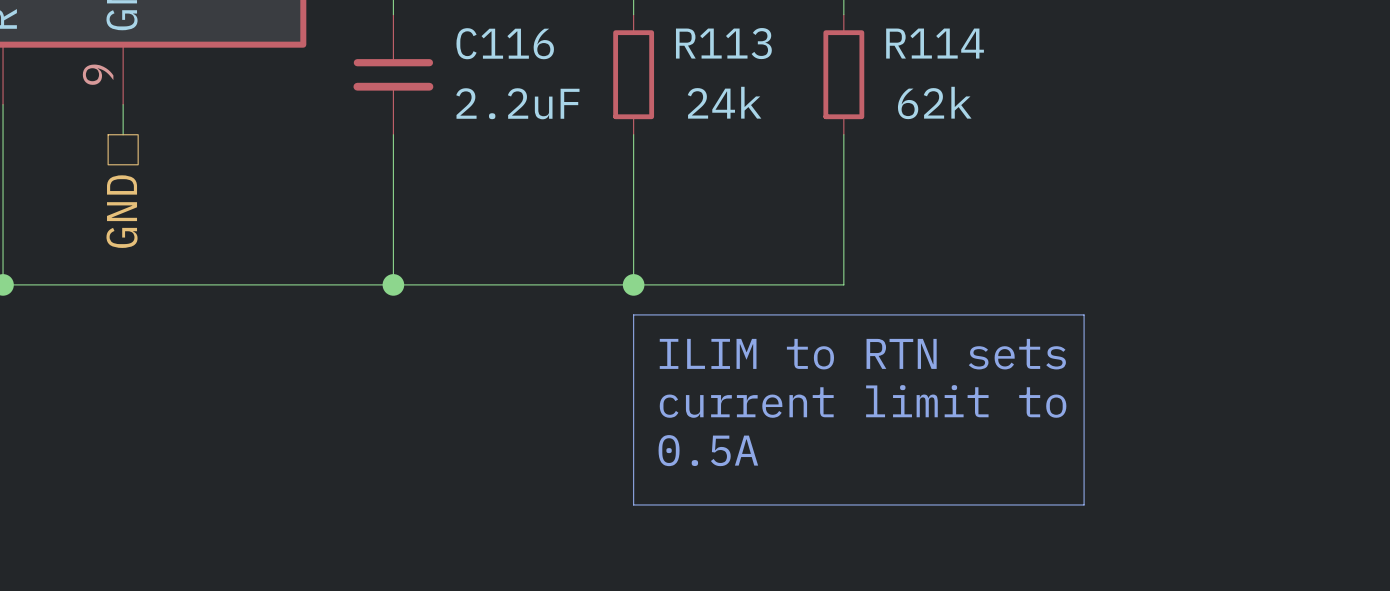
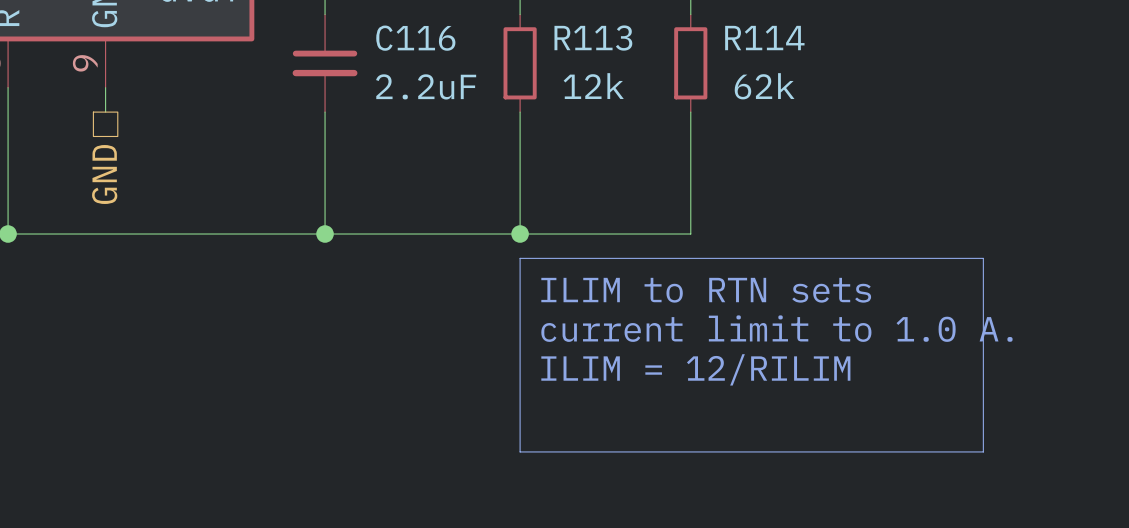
R113 value: 24k (724, 102) -> 12k (593, 86)
line: (1084, 314) (1084, 504) (633, 504) -> (885, 258) (983, 258) (983, 451) (520, 451) (520, 412)
text: current limit to (863, 401) -> current limit to 1.0 A. (776, 328)
text: 0.5A (708, 450) -> ILIM = 12/RILIM (695, 369)

